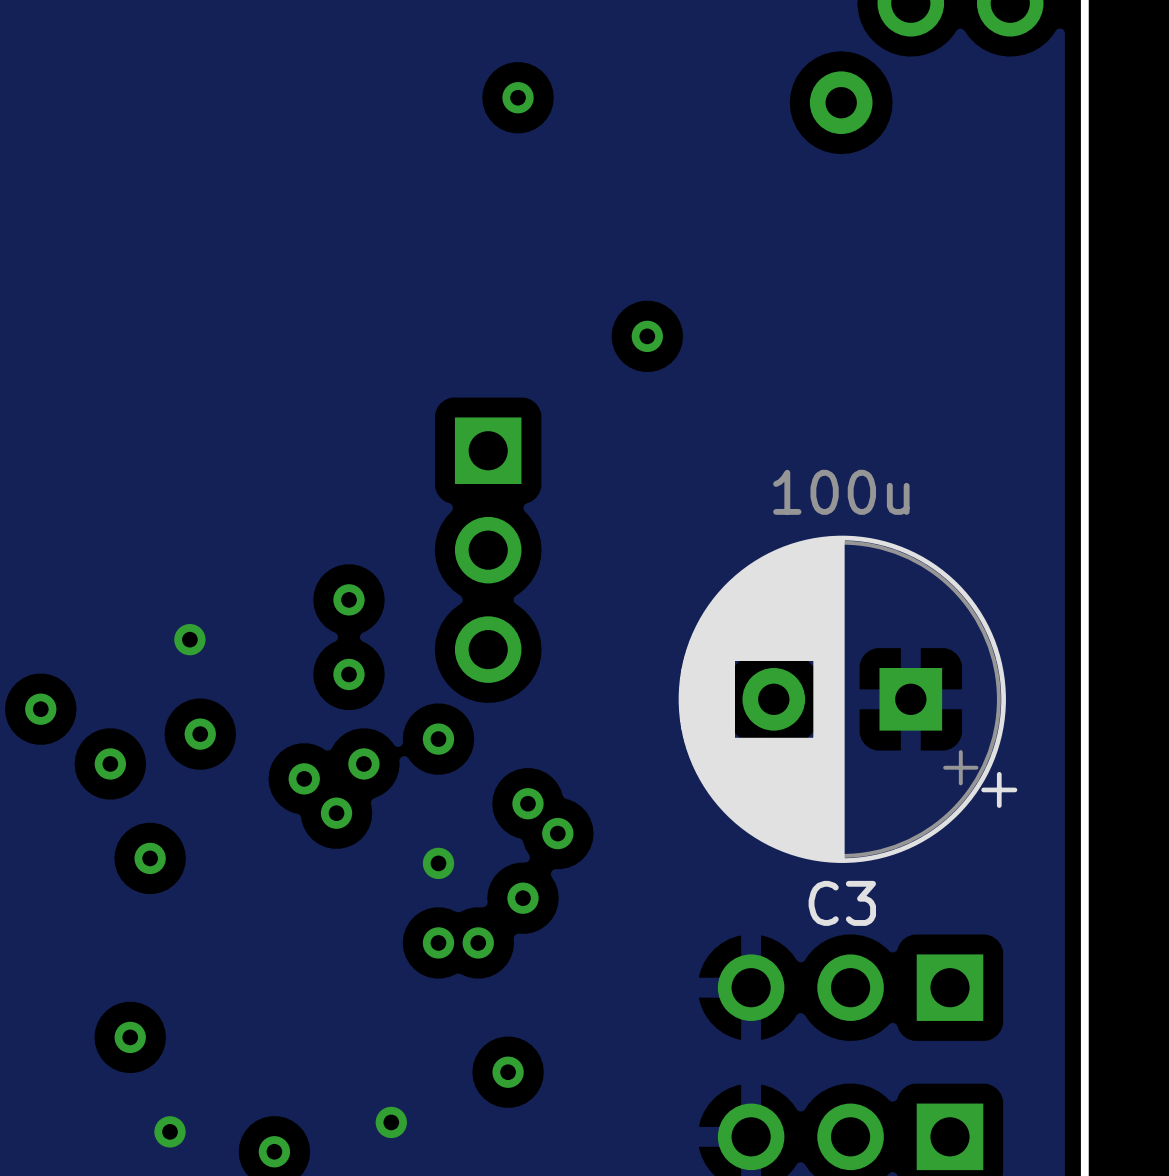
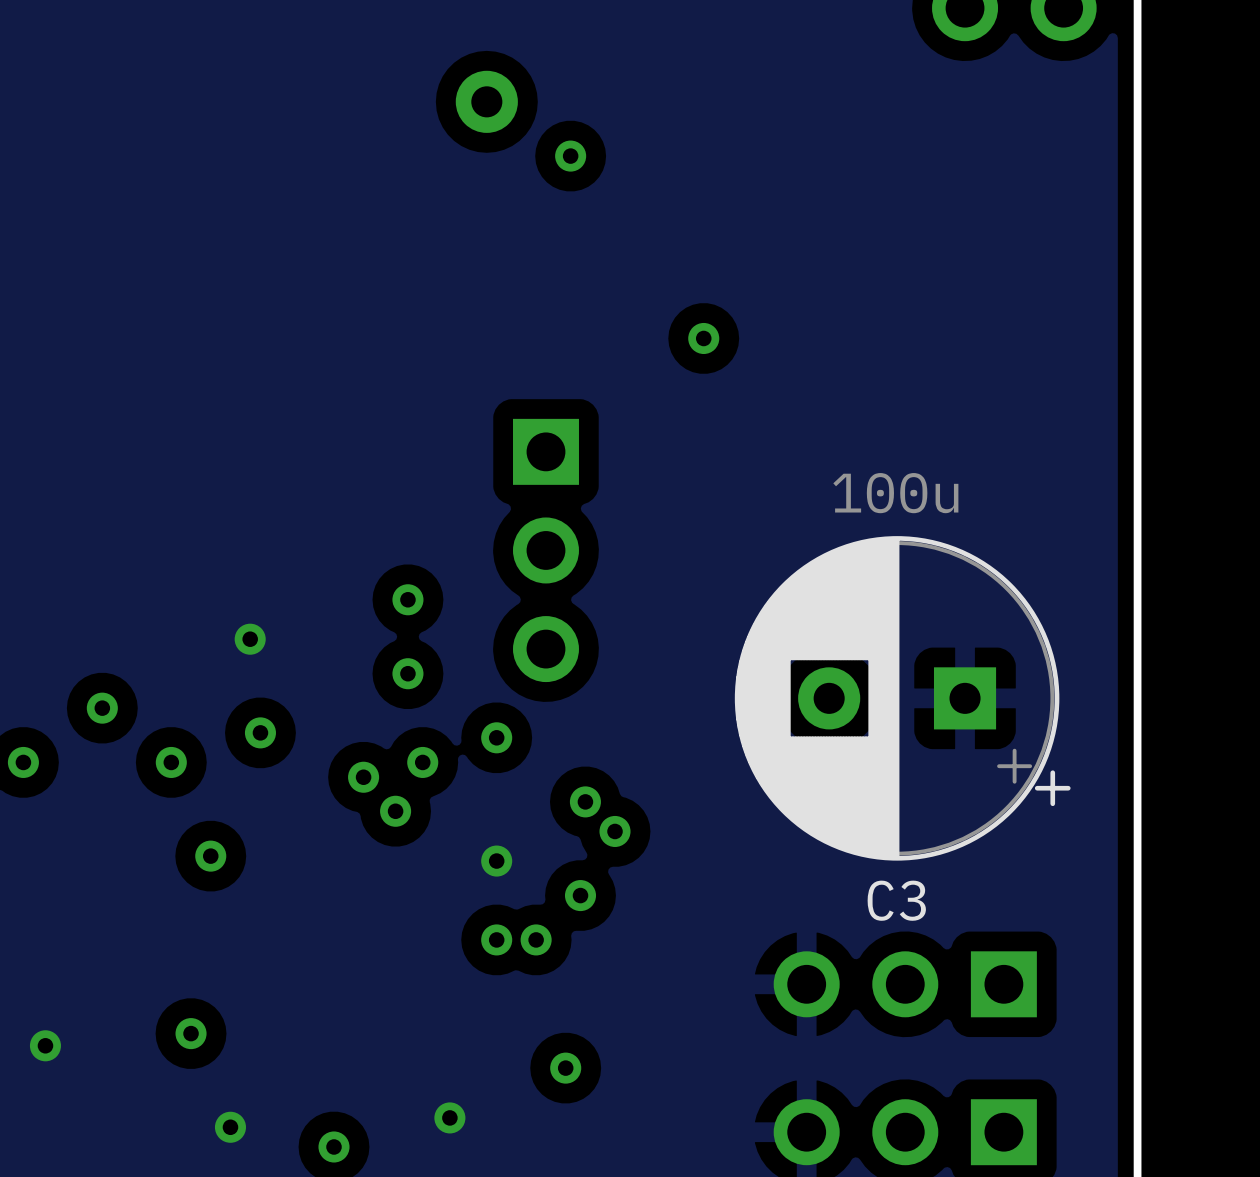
via: none -> (486, 101)
via position: (518, 97) -> (570, 156)
via: (841, 102) -> none

